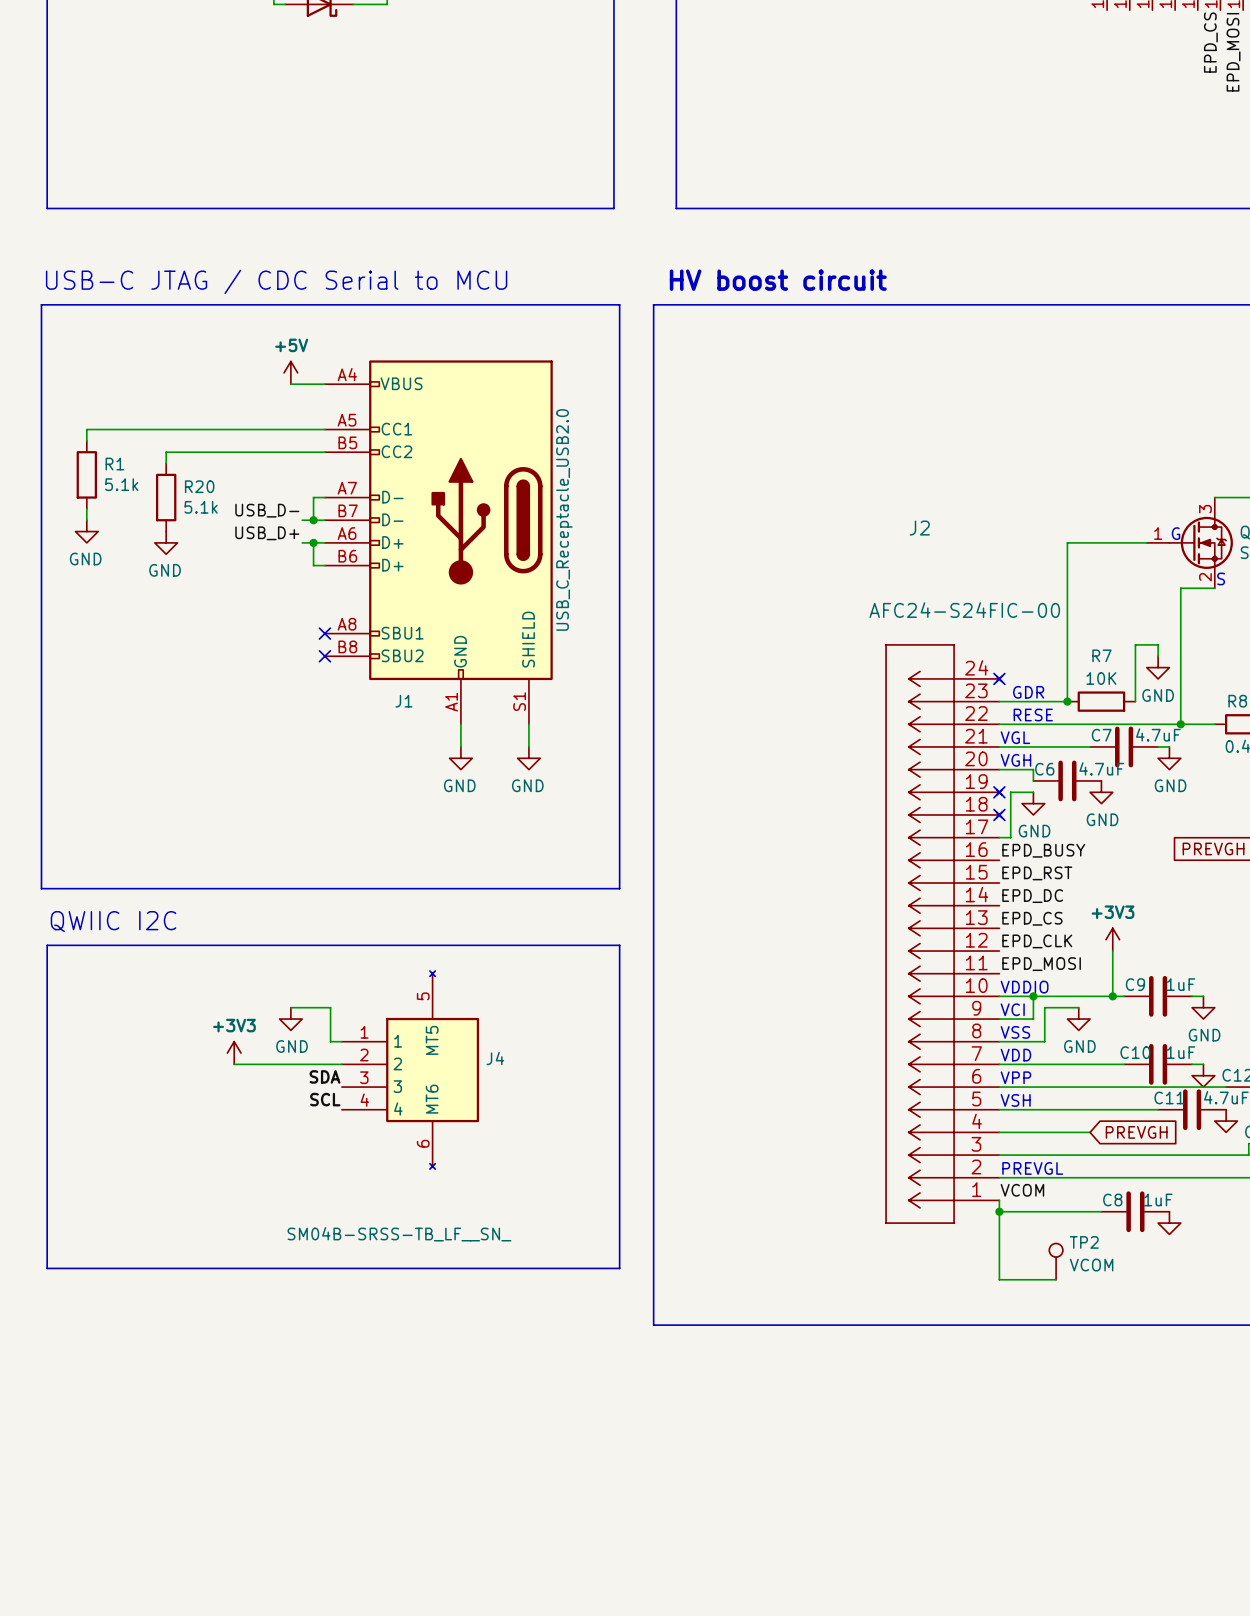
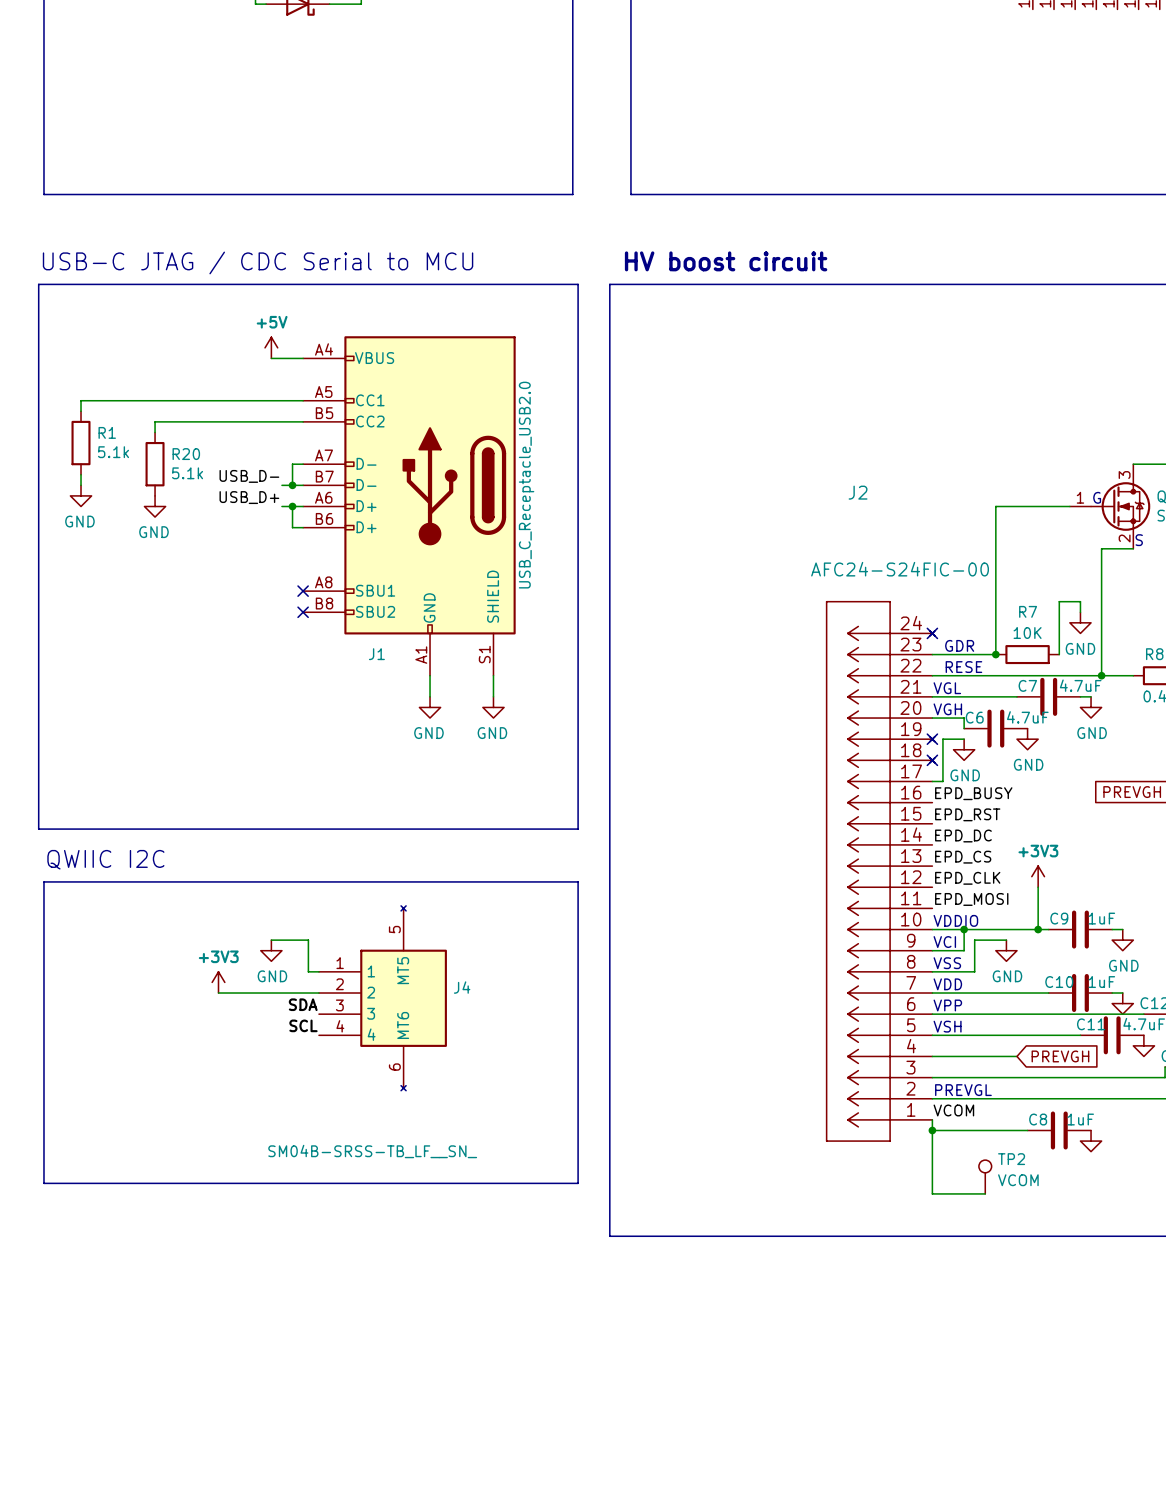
label: EPD_CS (1210, 42) -> none
label: EPD_MOSI (1233, 52) -> none

